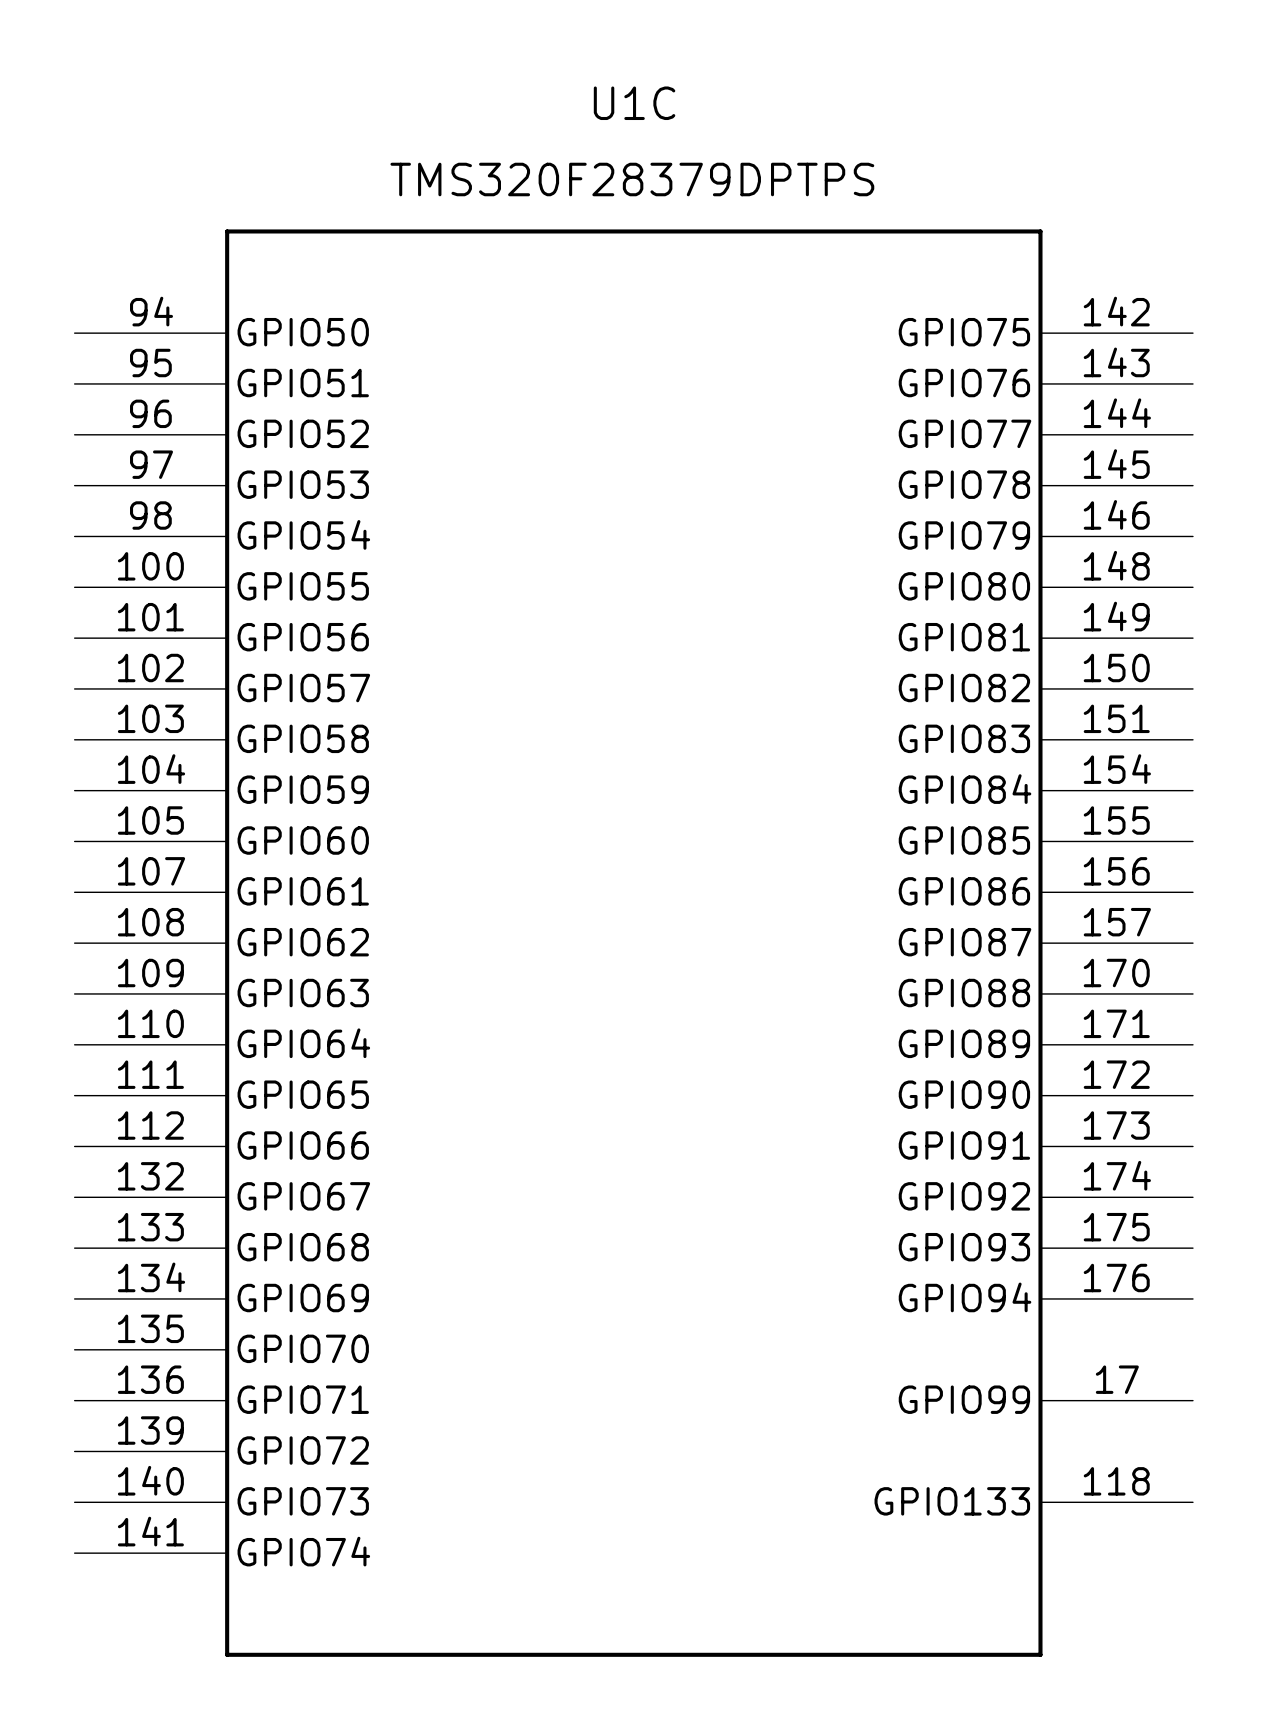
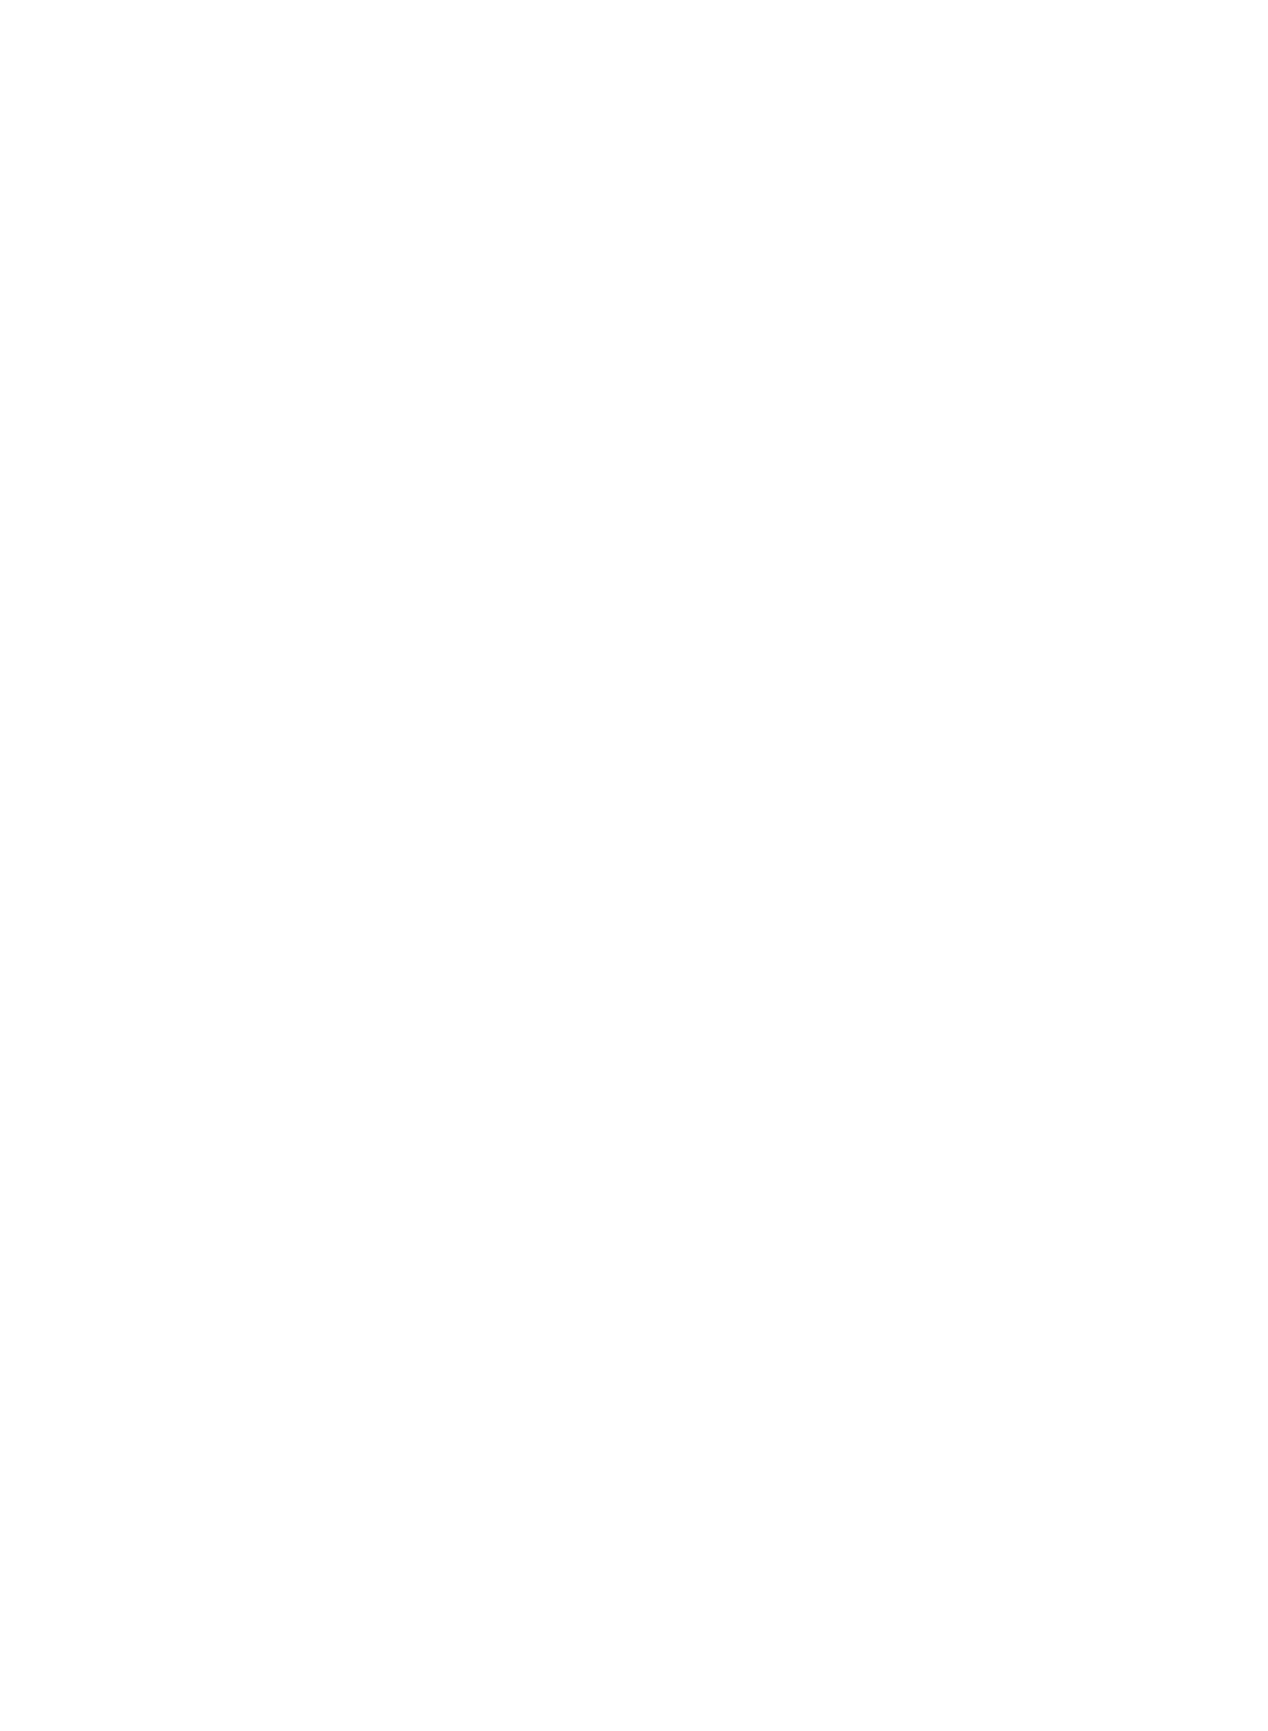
U1C: TMS320F28379DPTPS (633, 943) -> none

